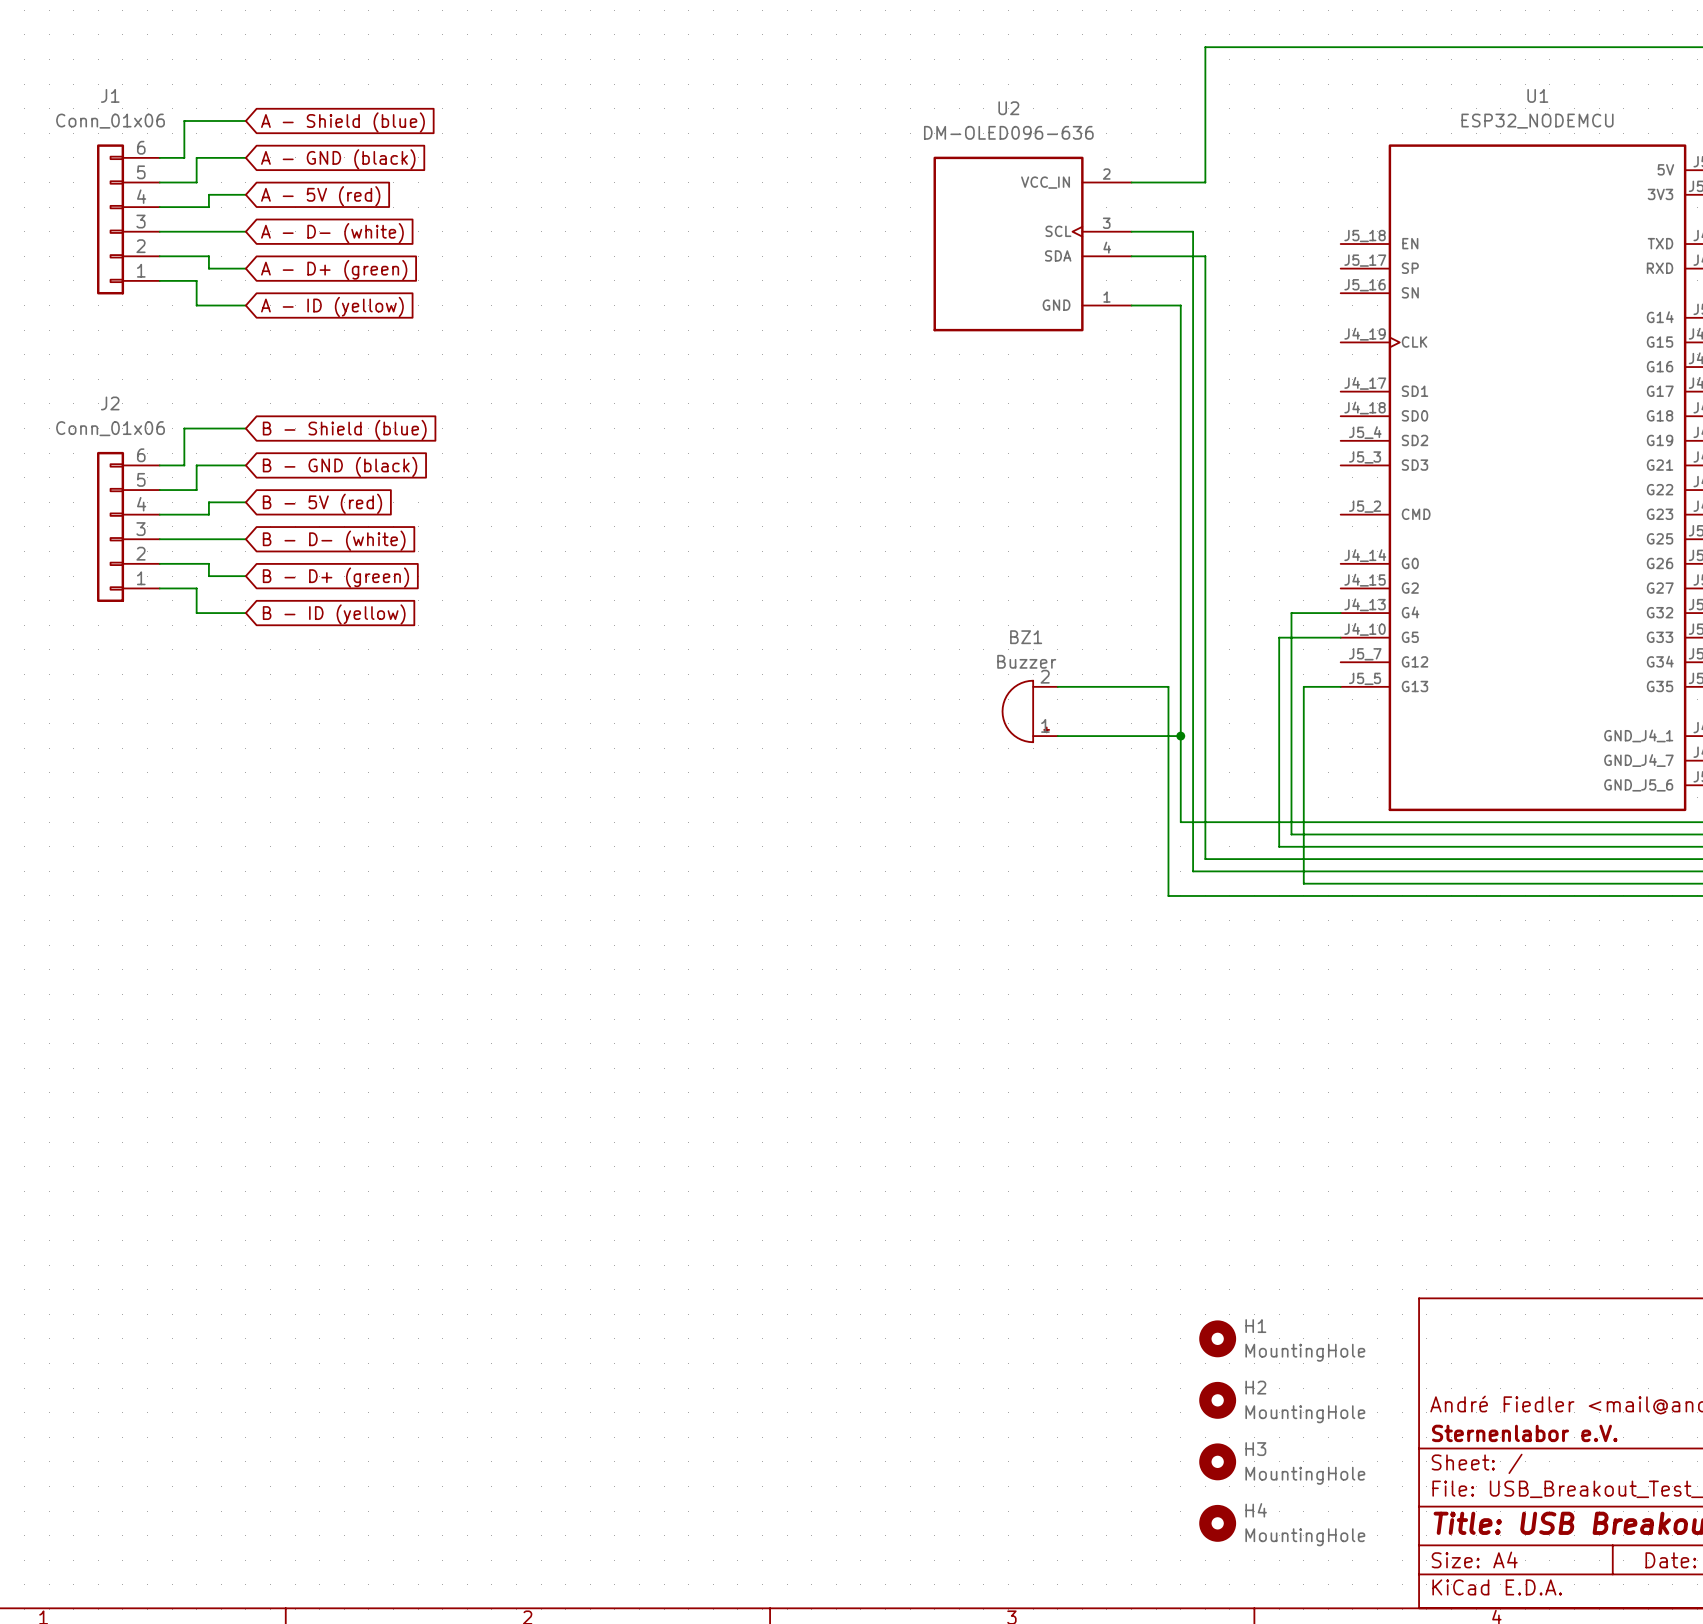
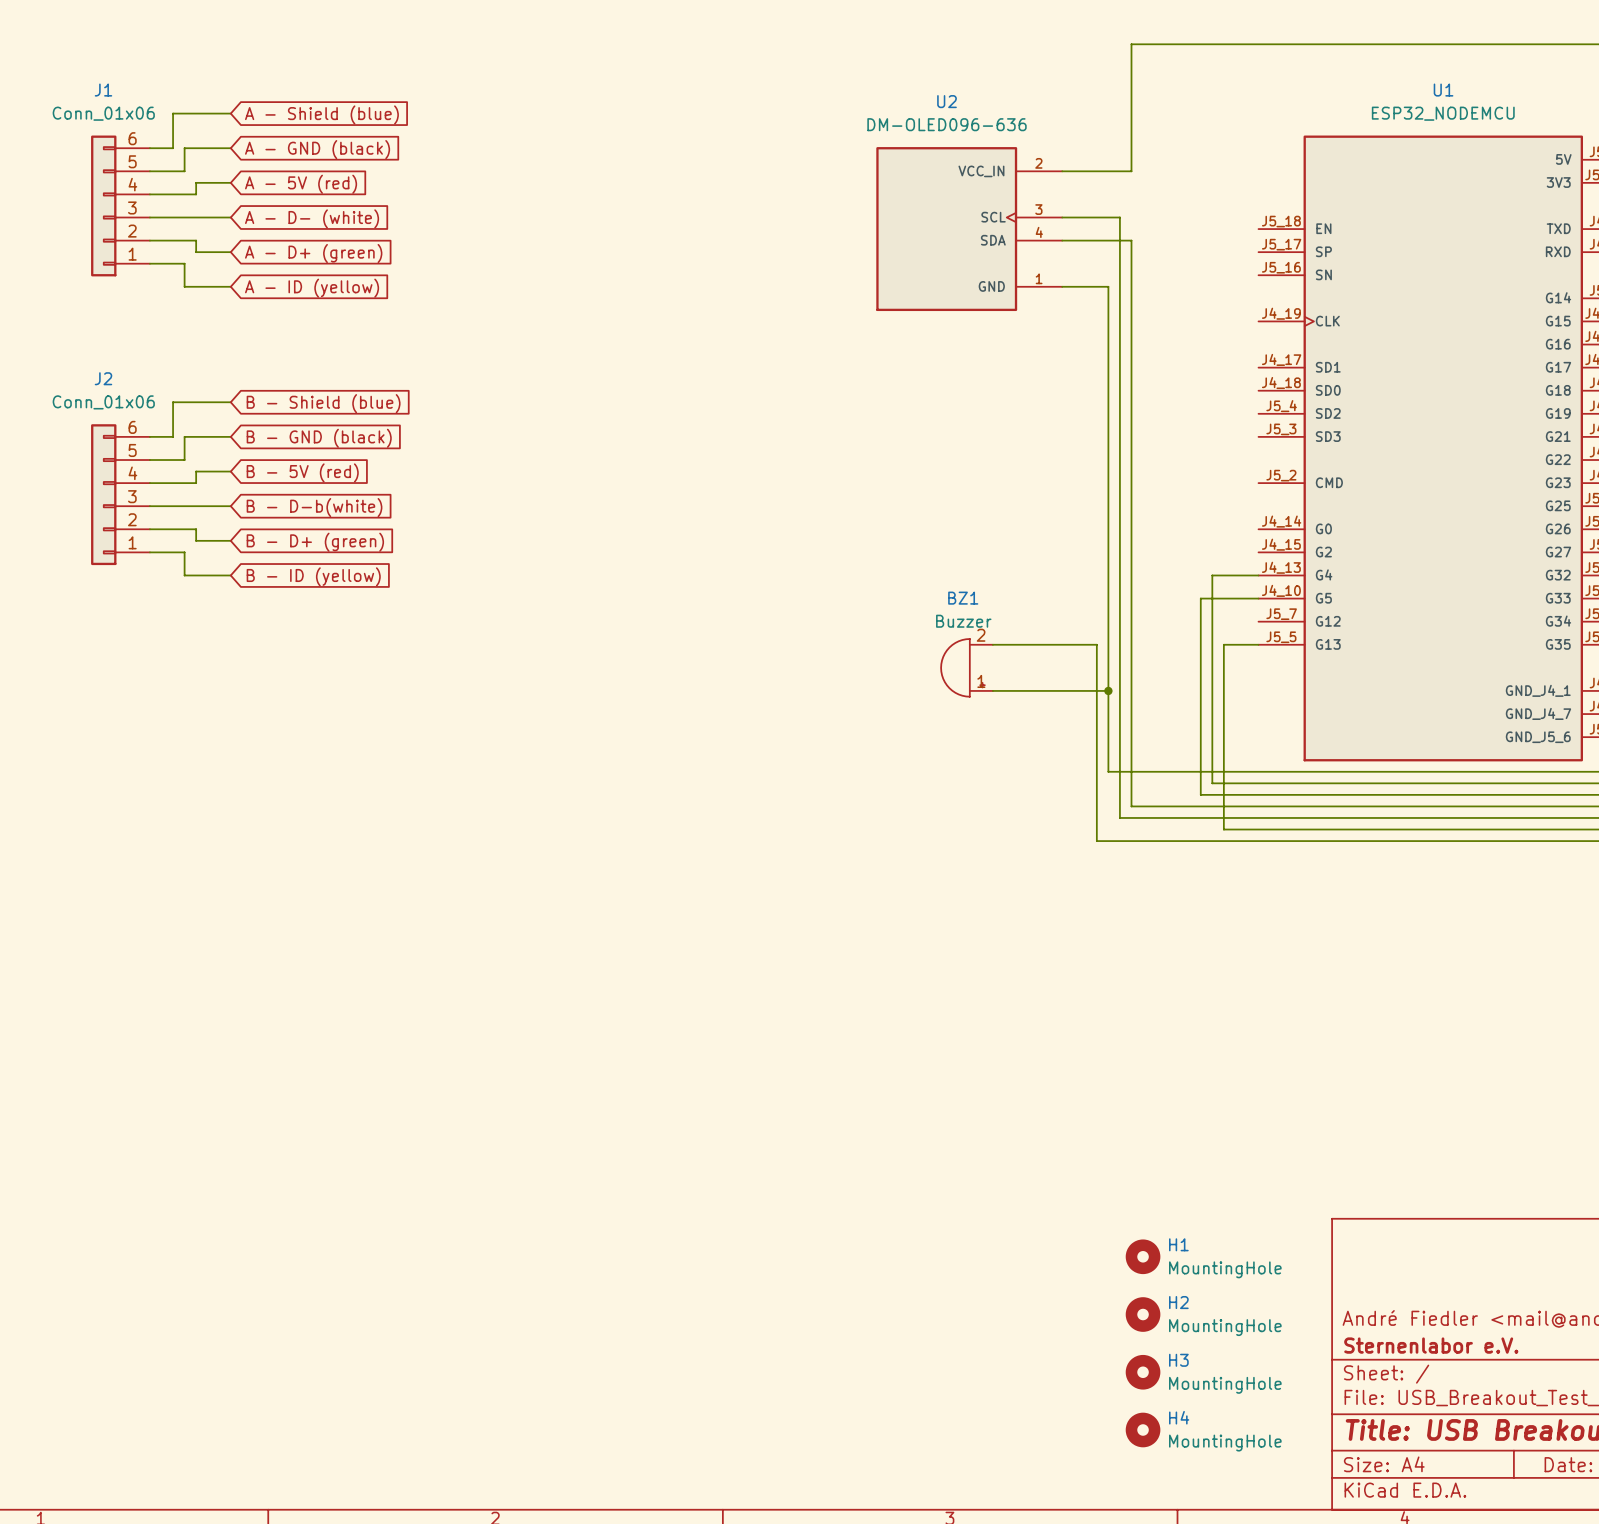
global label: B - D- (white) (334, 540) -> B - D-b(white) (314, 507)

